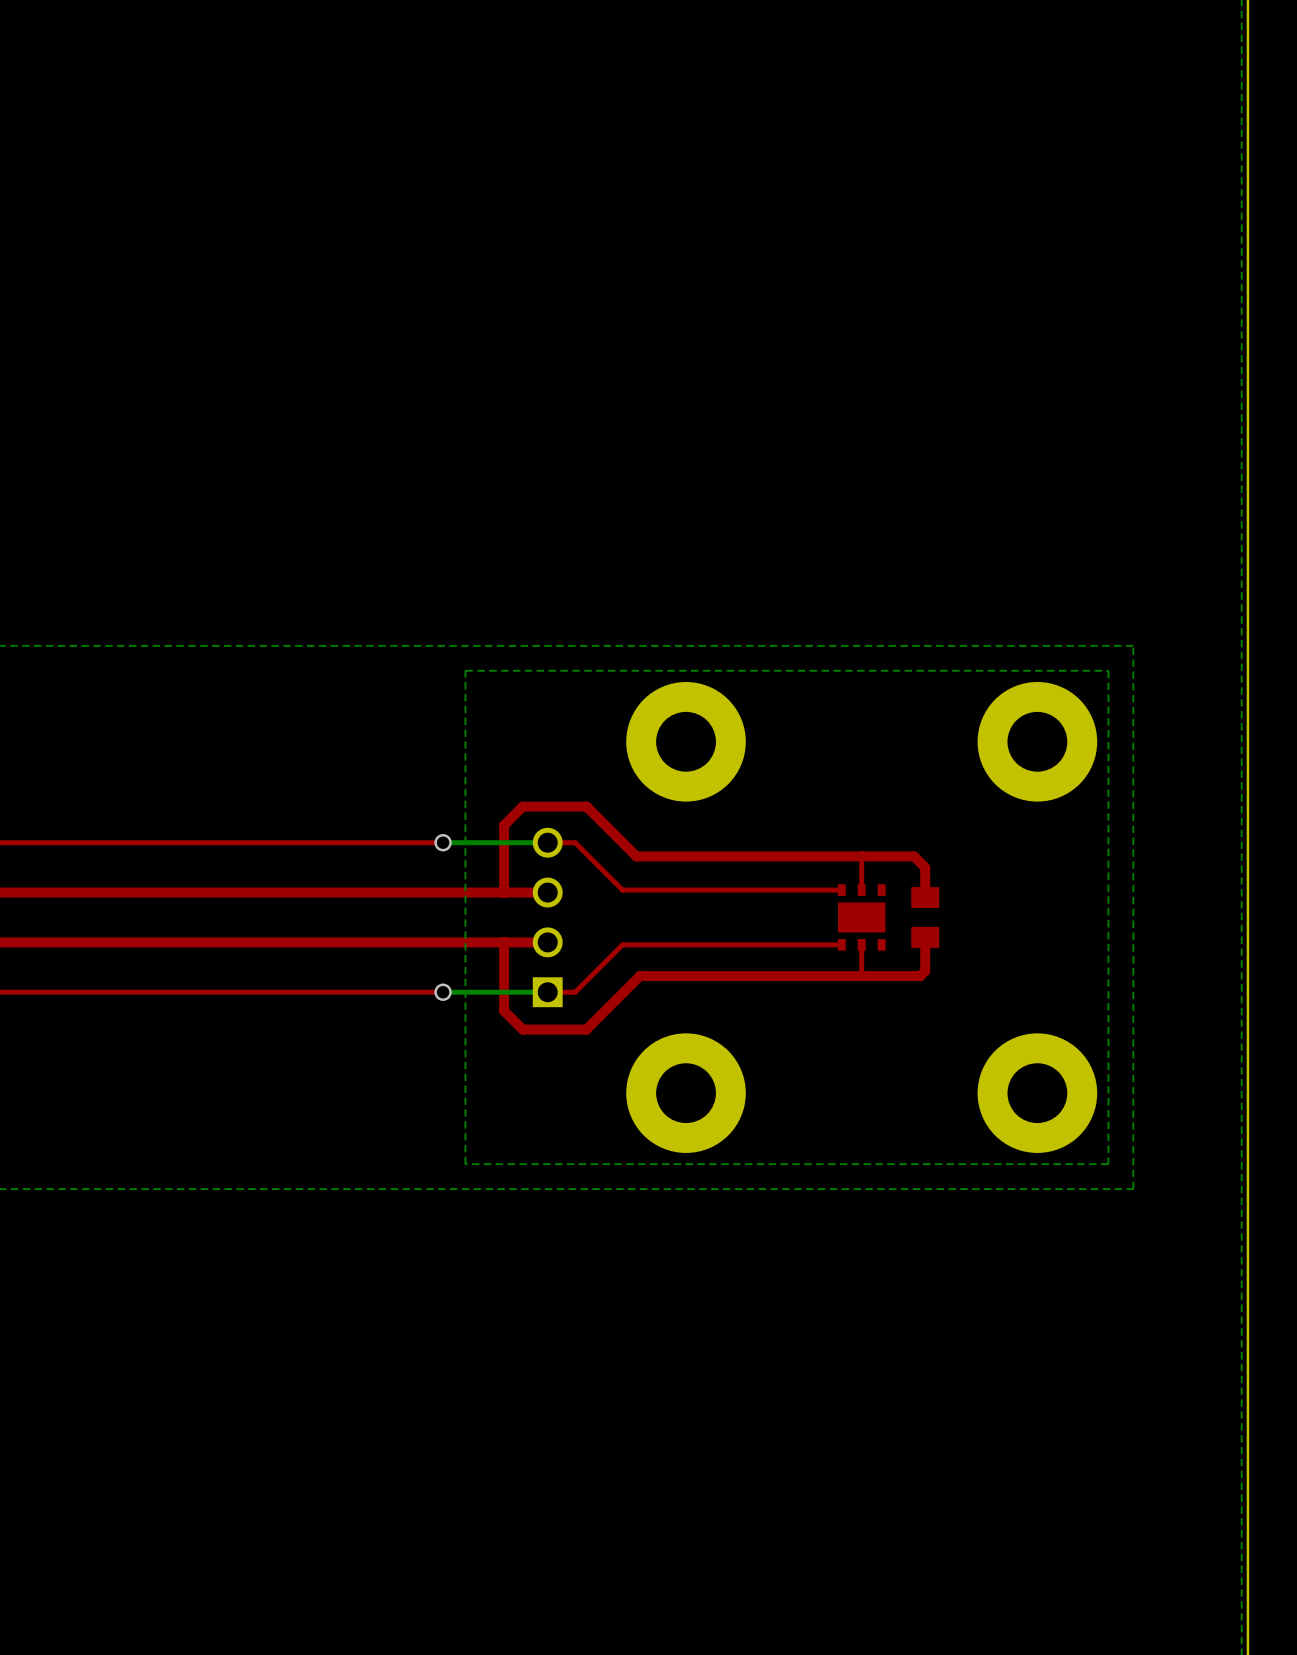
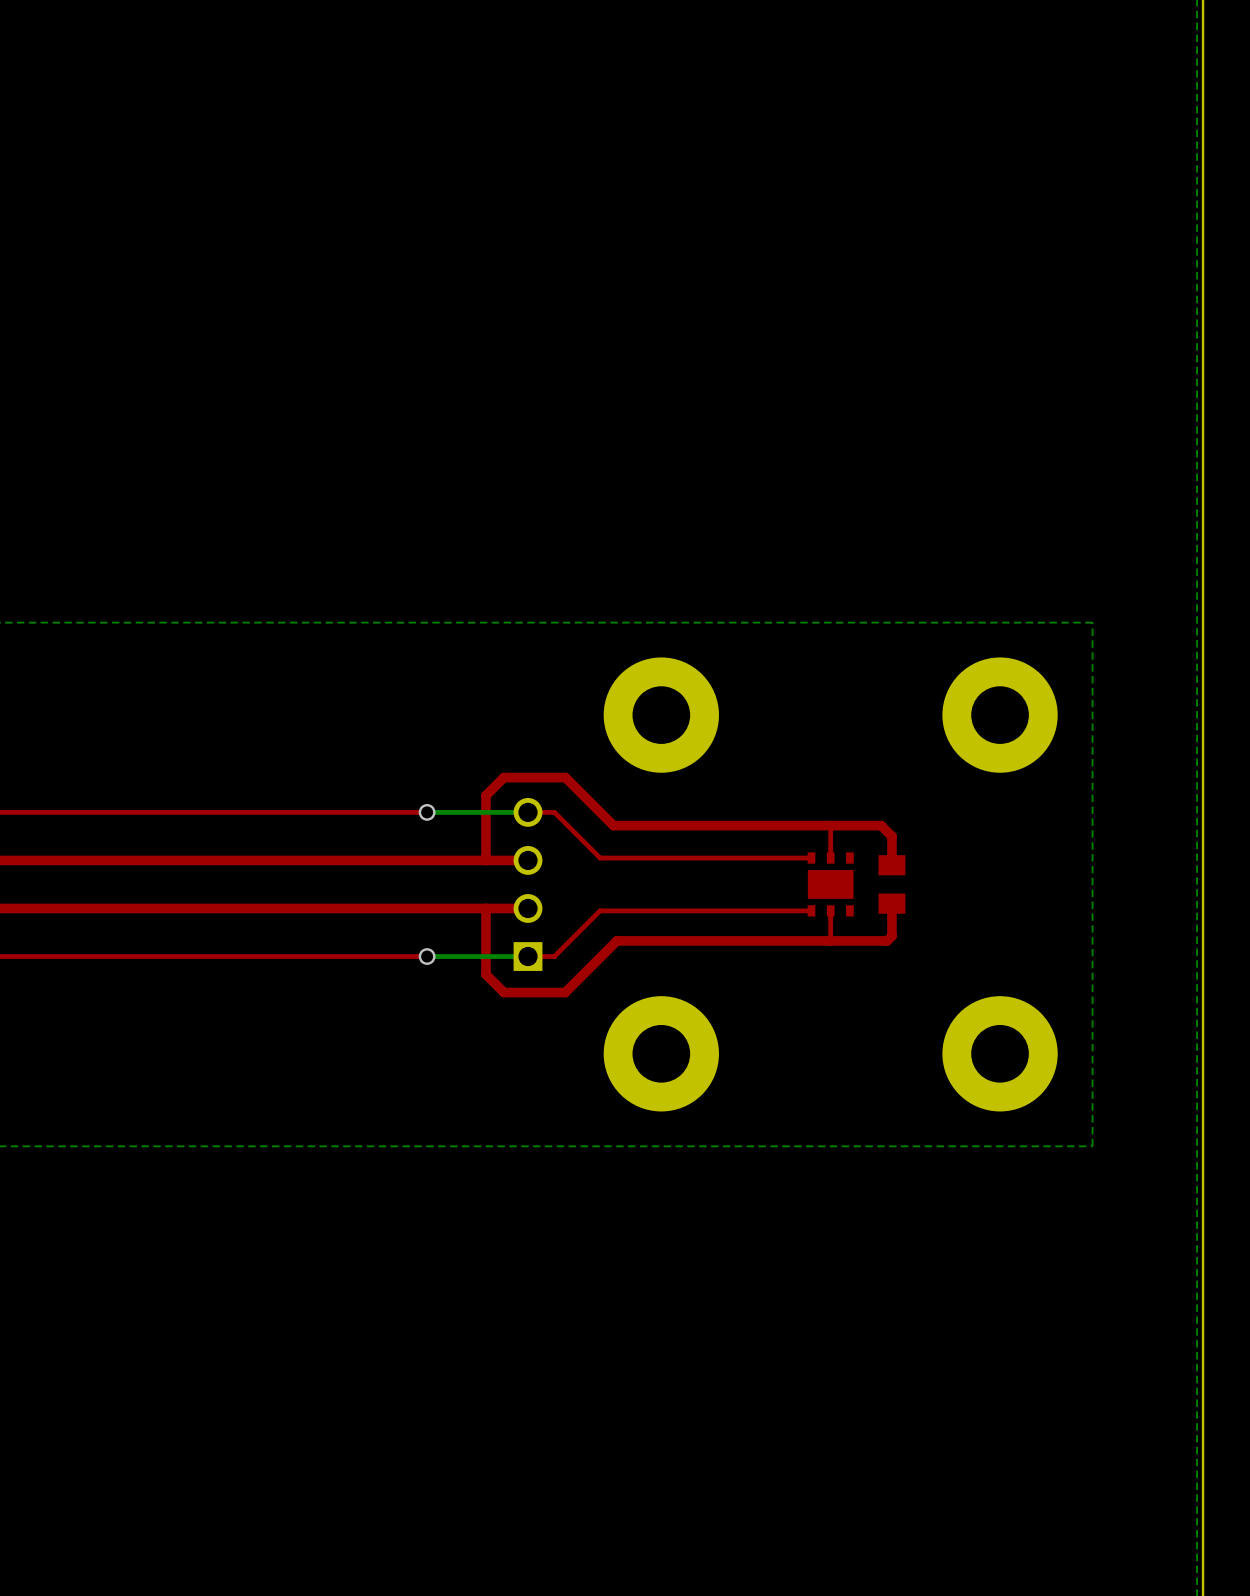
bottom zone outline: (1108, 670) (465, 670) (465, 1164) (1108, 1164) (1108, 670) -> none

